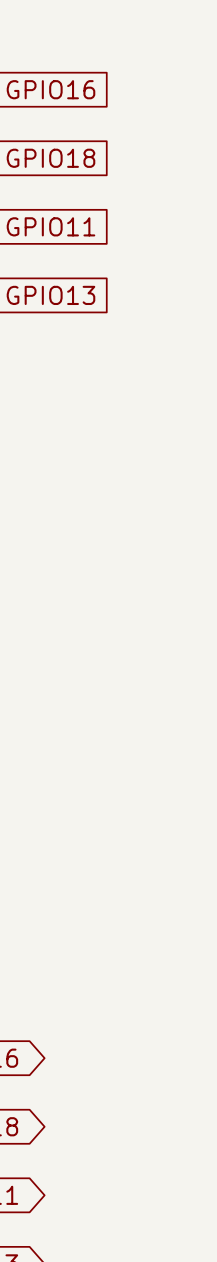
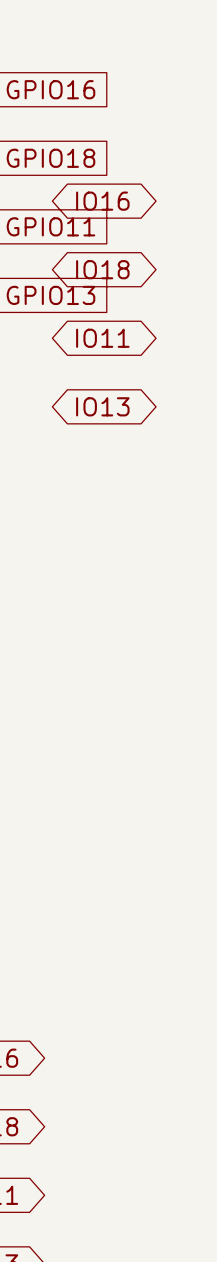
global label: none -> IO16 (102, 201)
global label: none -> IO18 (102, 269)
global label: none -> IO11 (102, 338)
global label: none -> IO13 (102, 406)

